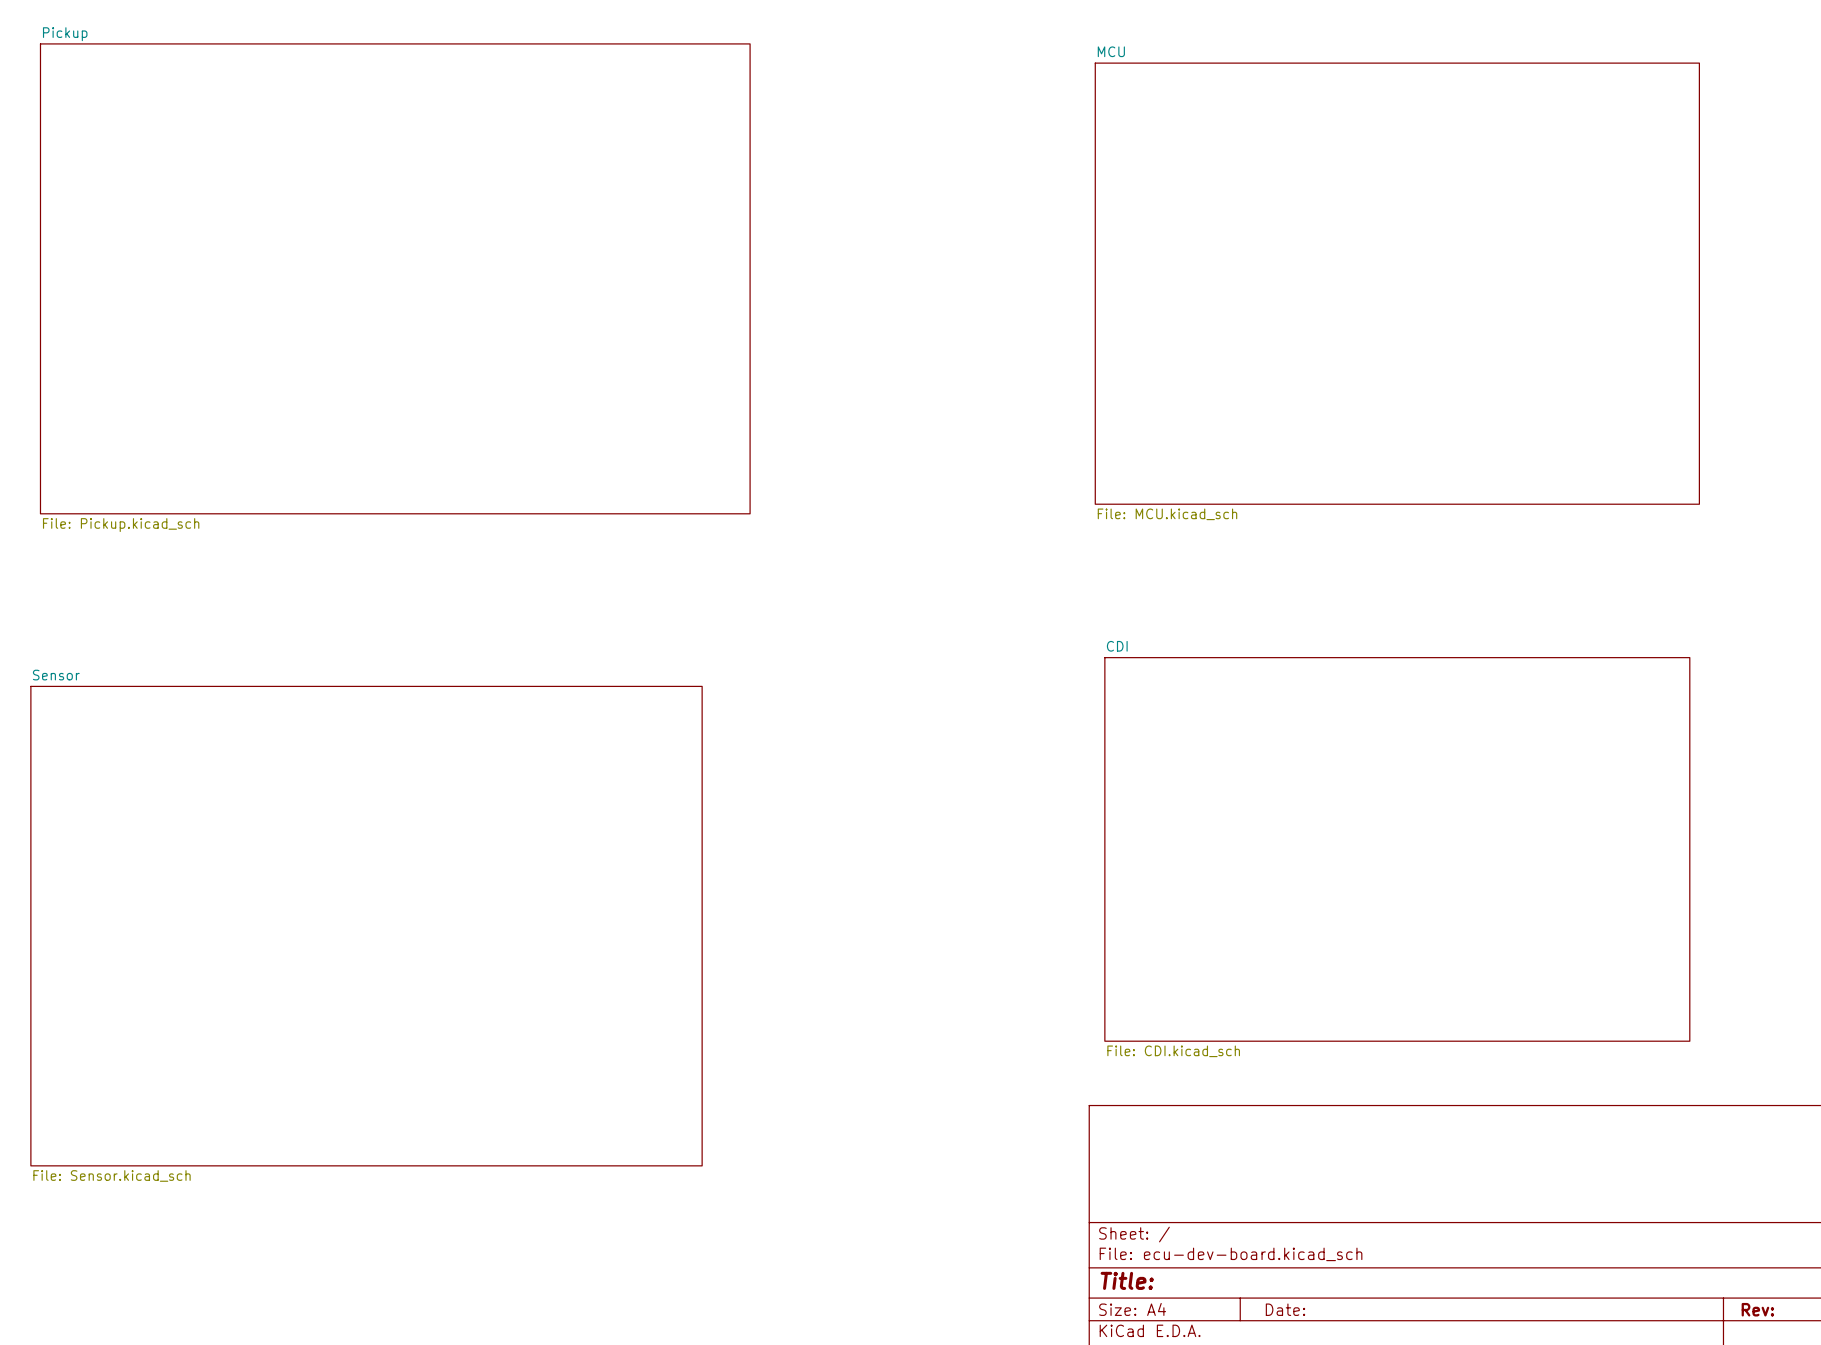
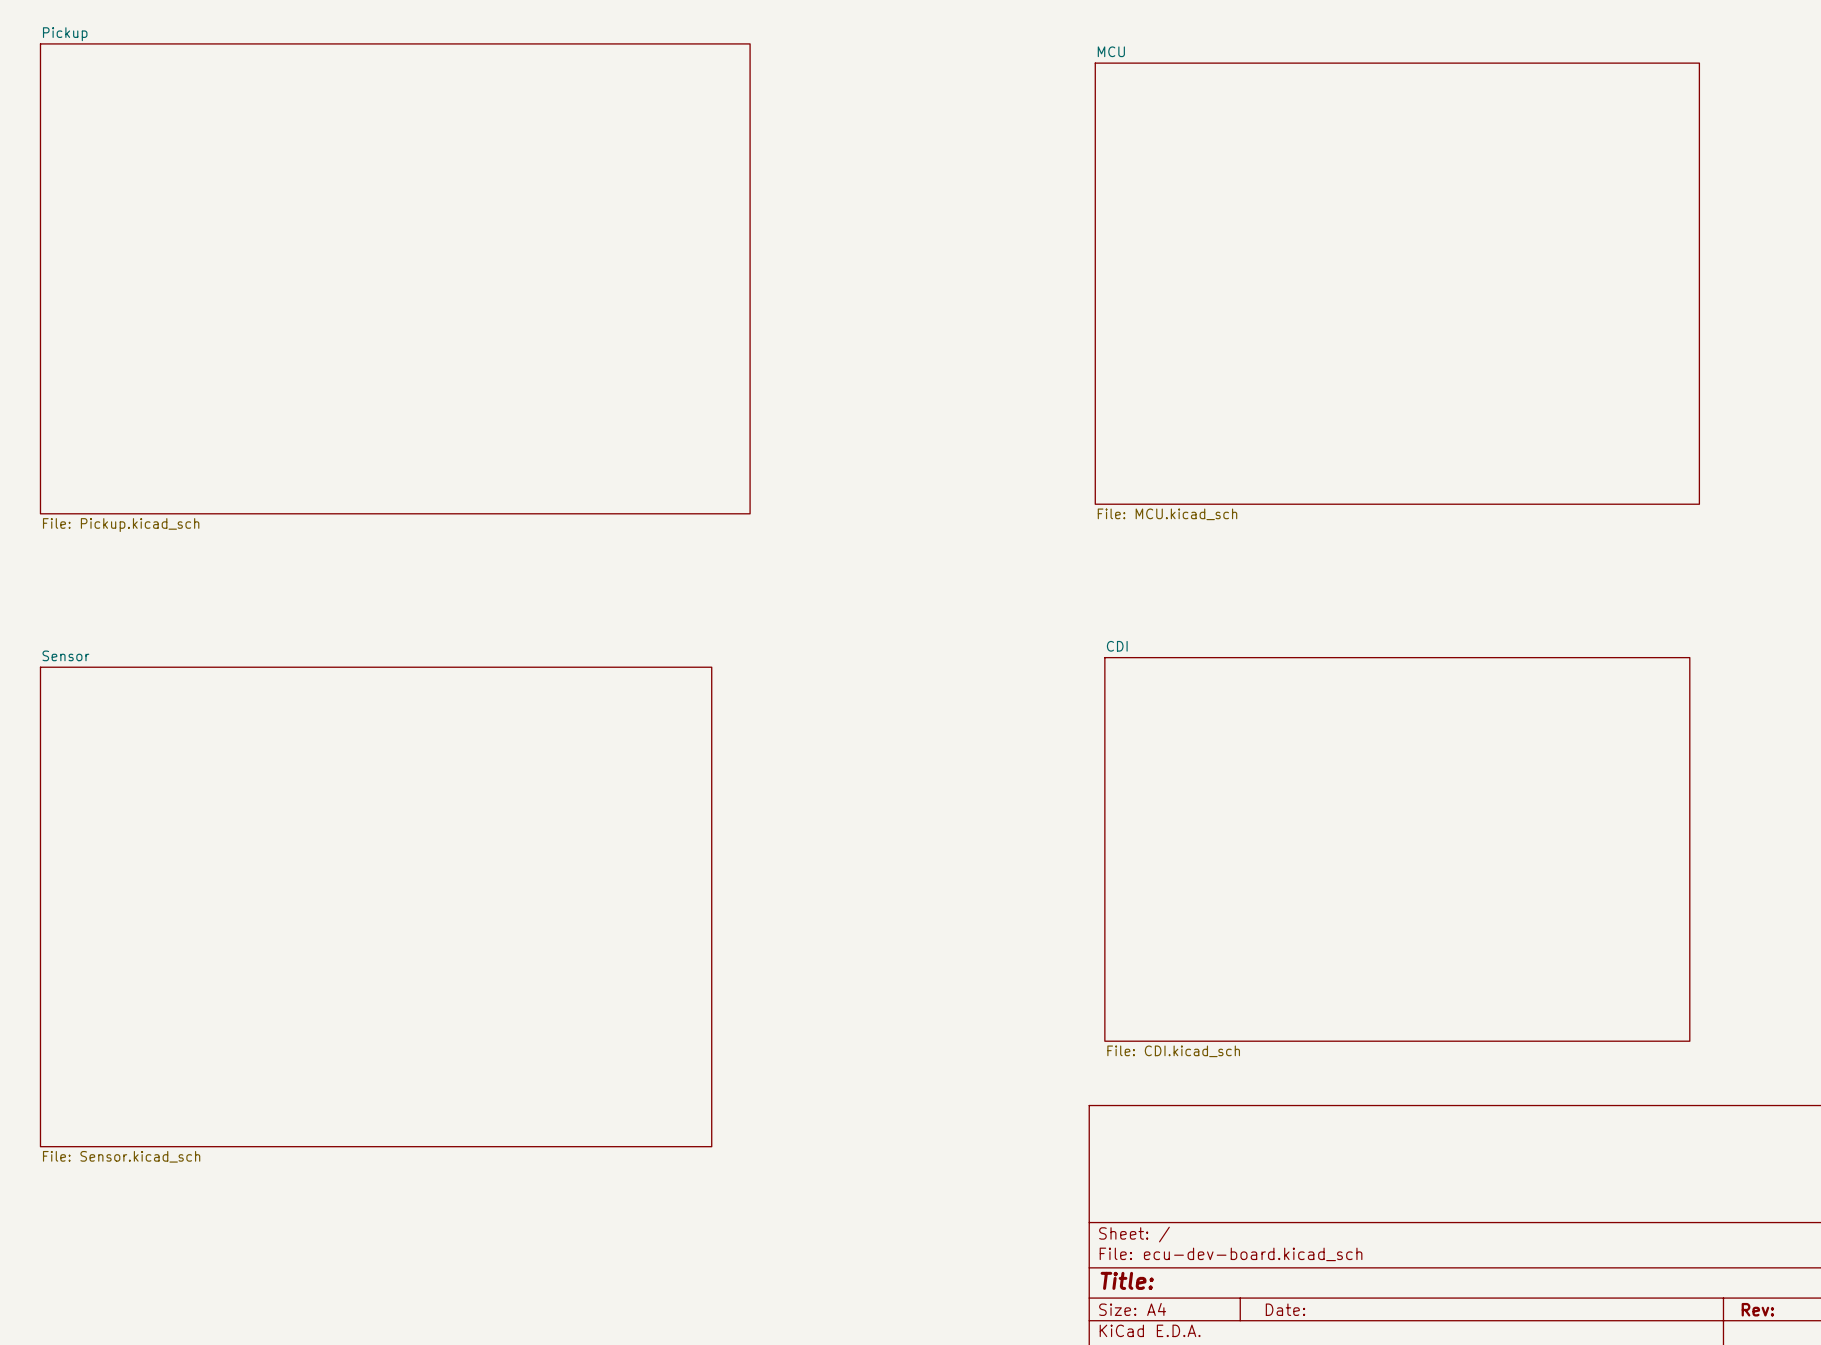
sheet Sensor position: (366, 926) -> (376, 906)

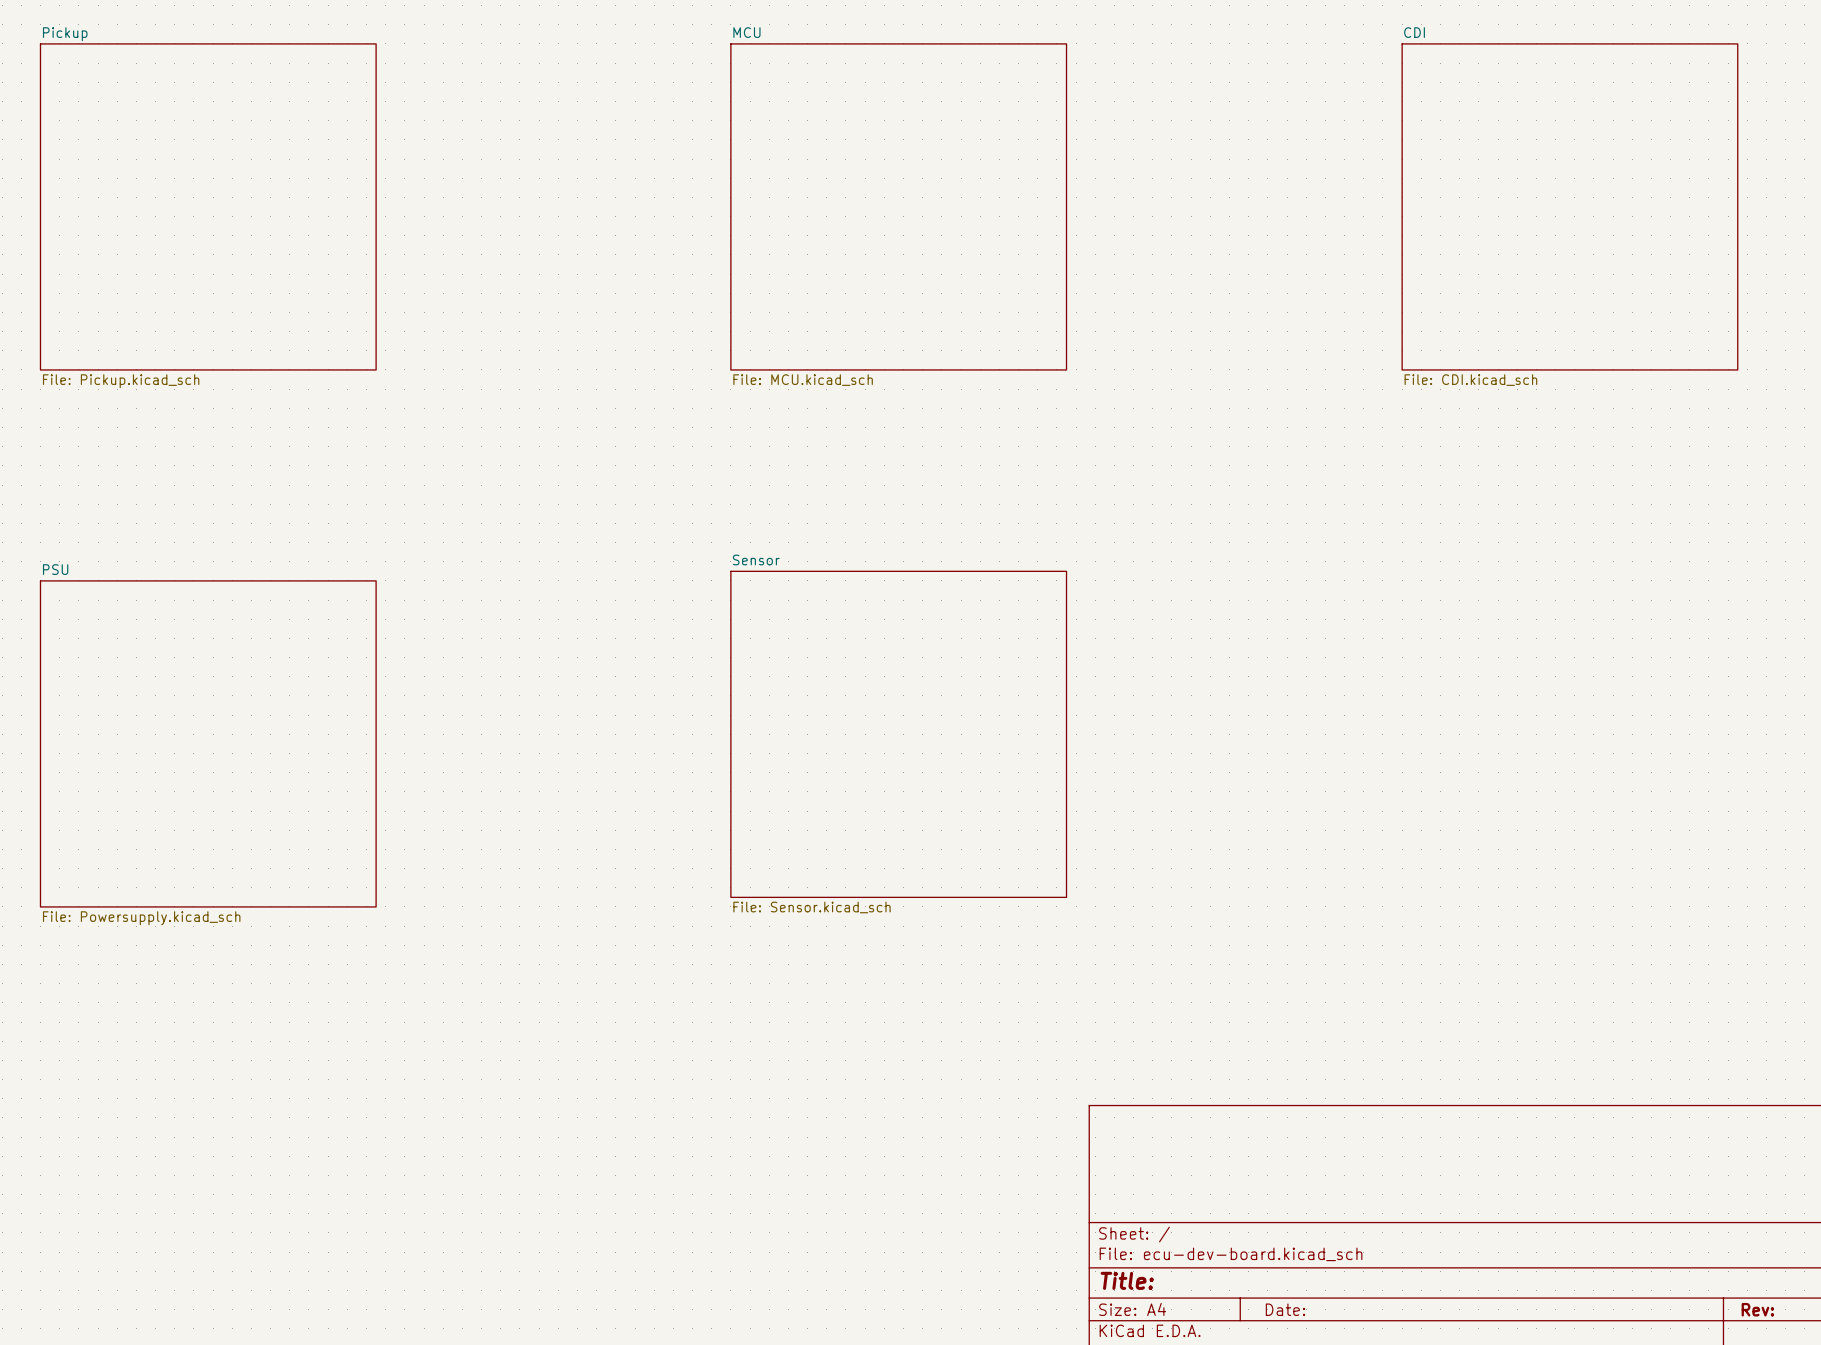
sheet Pickup: none -> File: Pickup.kicad_sch (208, 206)
sheet MCU: none -> File: MCU.kicad_sch (898, 206)
sheet CDI: none -> File: CDI.kicad_sch (1569, 206)
sheet Pickup: File: Pickup.kicad_sch (395, 278) -> none
sheet MCU: File: MCU.kicad_sch (1397, 283) -> none
sheet Sensor: none -> File: Sensor.kicad_sch (898, 734)
sheet PSU: none -> File: Powersupply.kicad_sch (208, 743)
sheet CDI: File: CDI.kicad_sch (1397, 849) -> none
sheet Sensor: File: Sensor.kicad_sch (376, 906) -> none

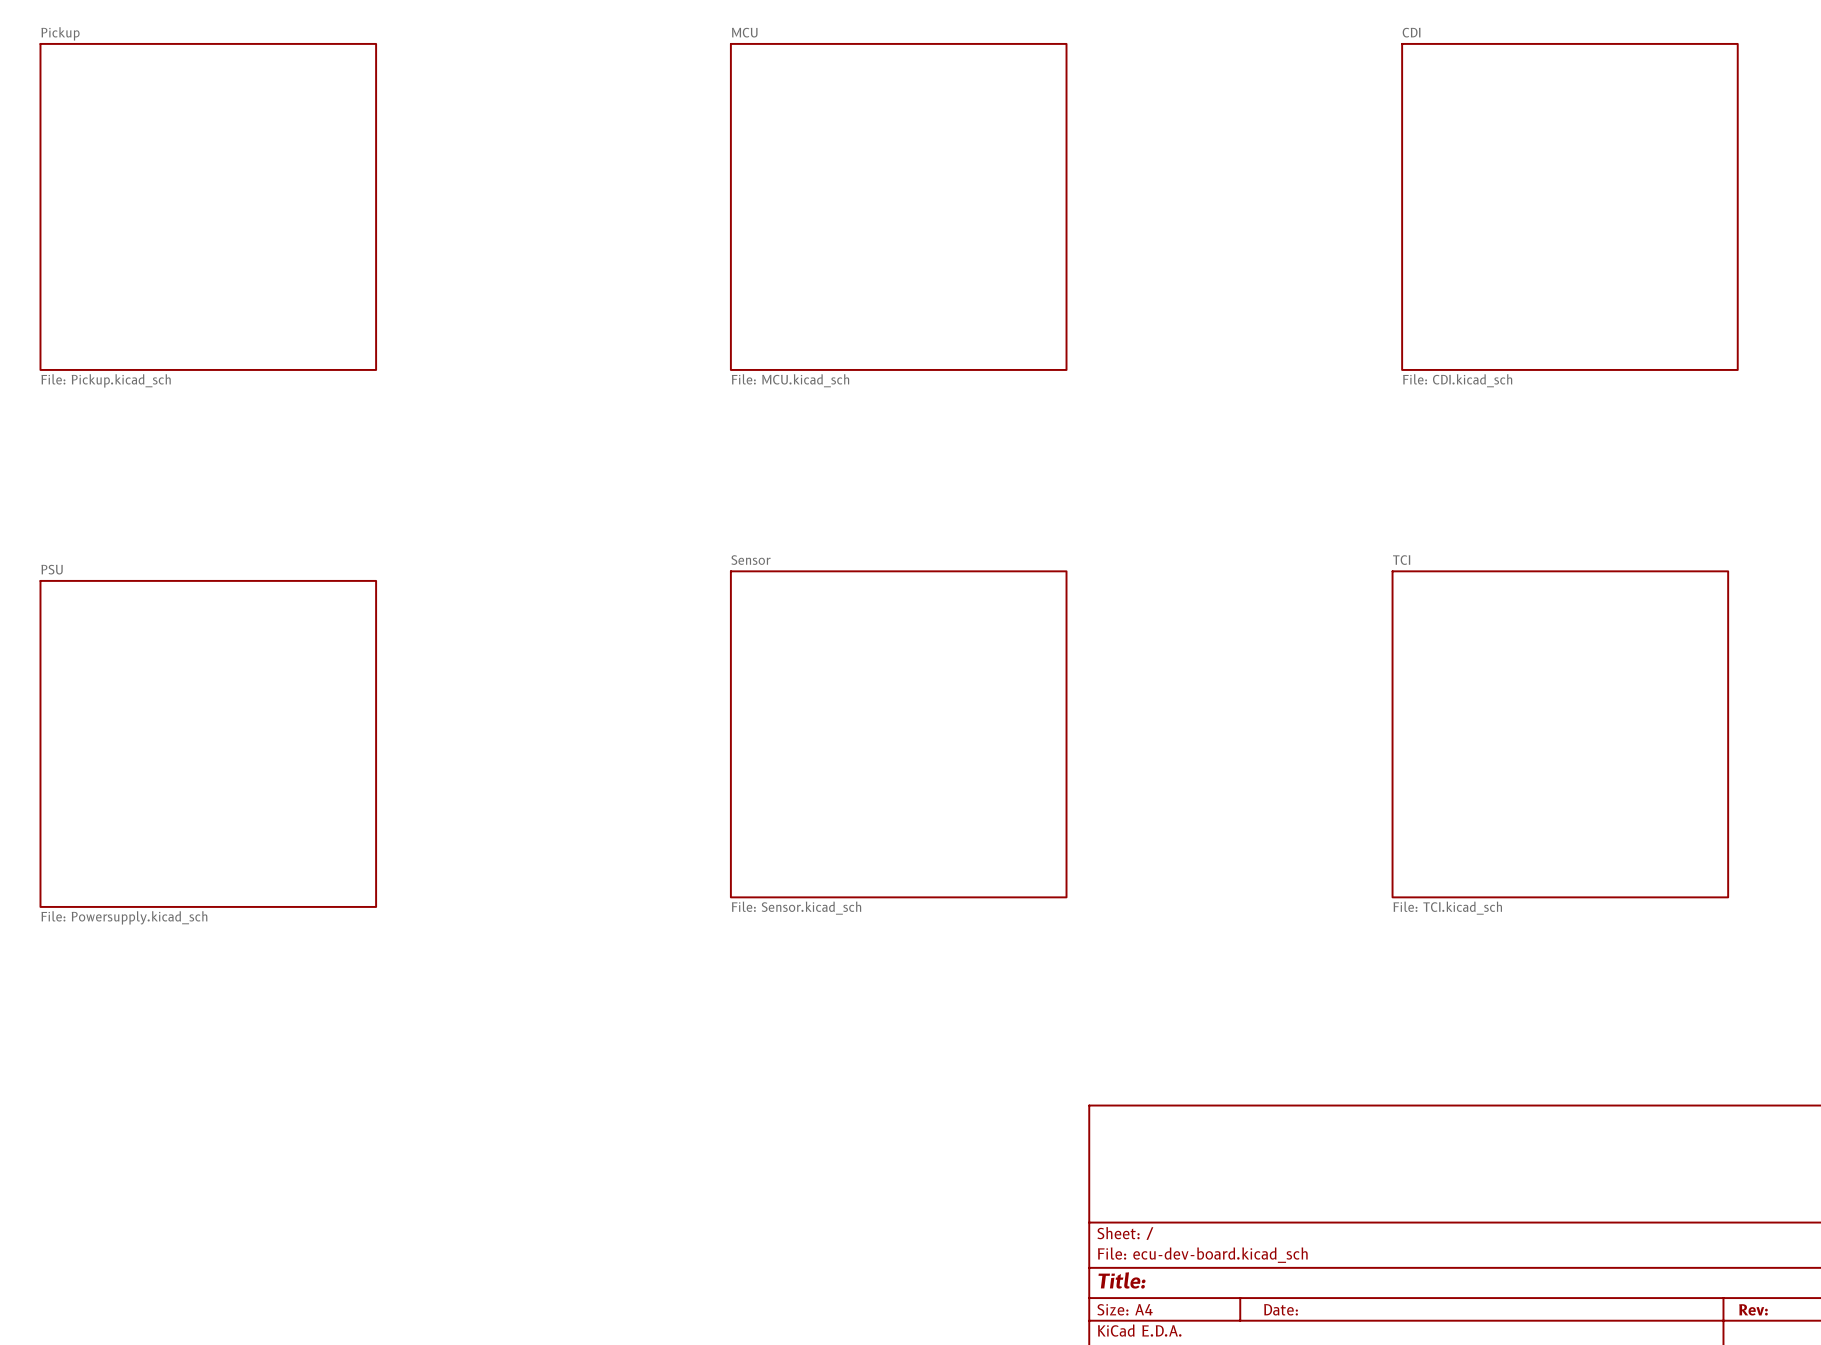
sheet TCI: none -> File: TCI.kicad_sch (1560, 734)

